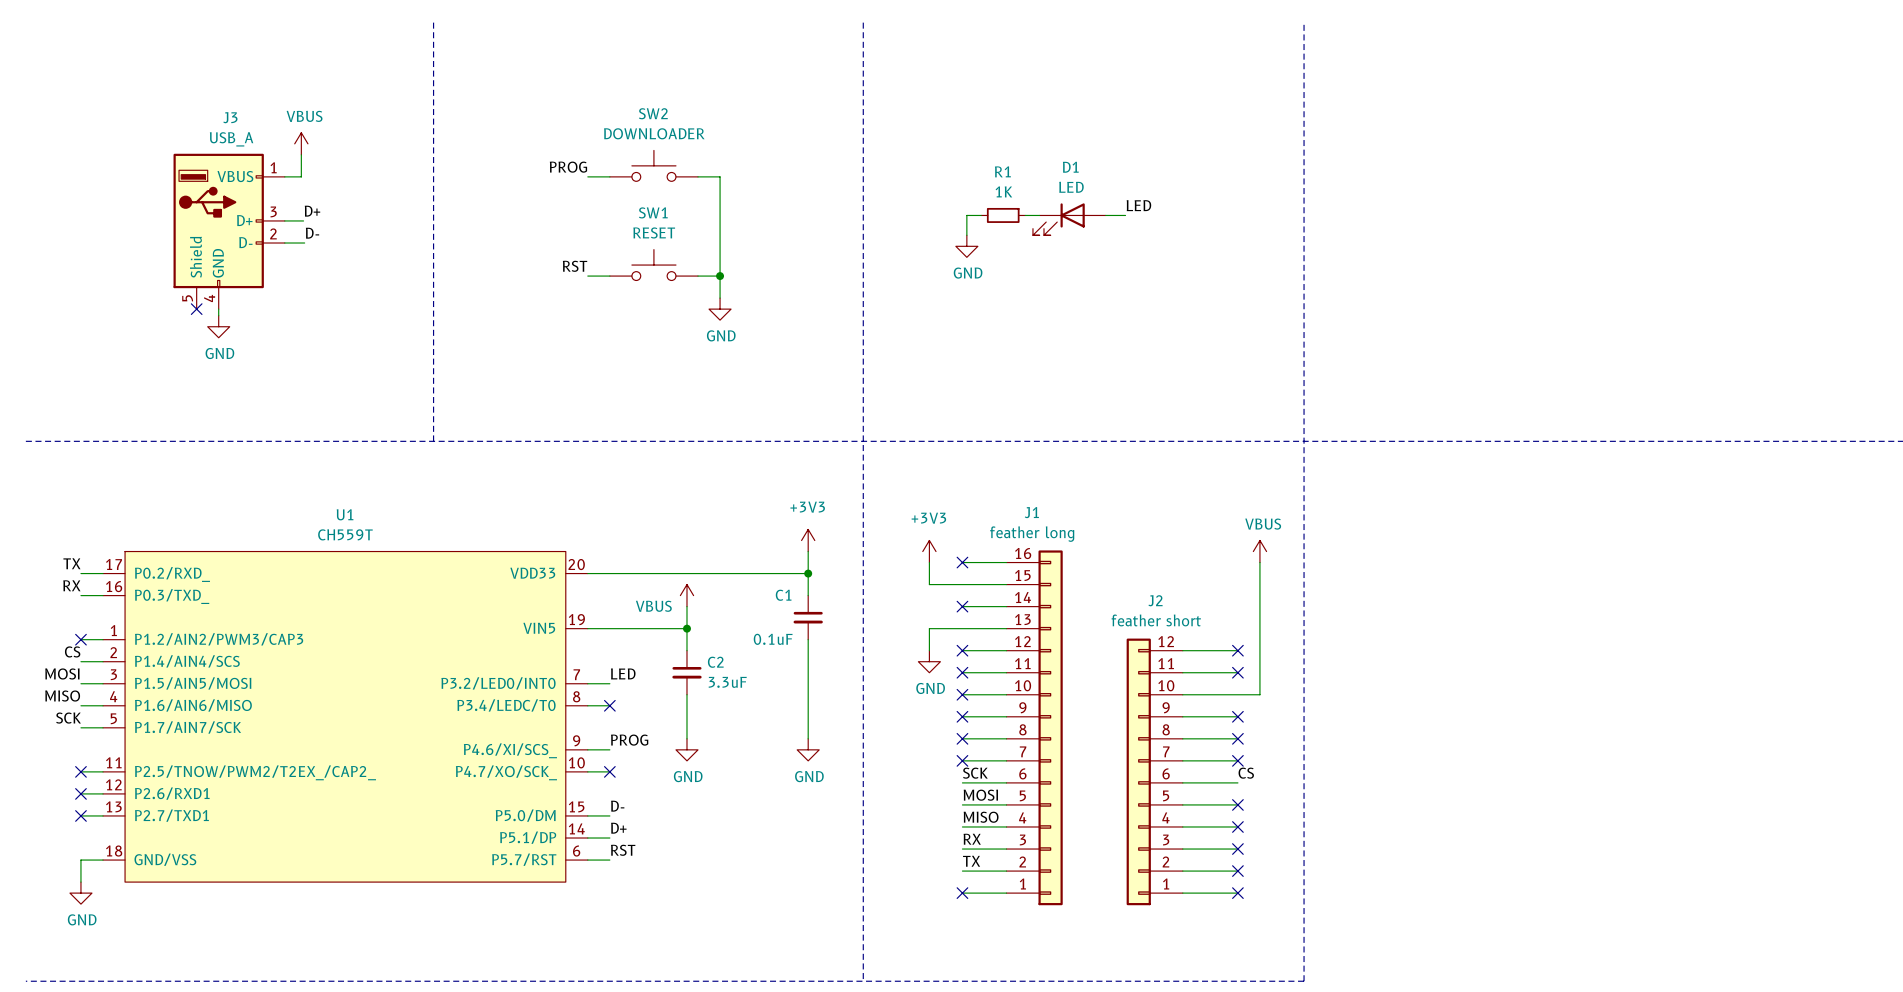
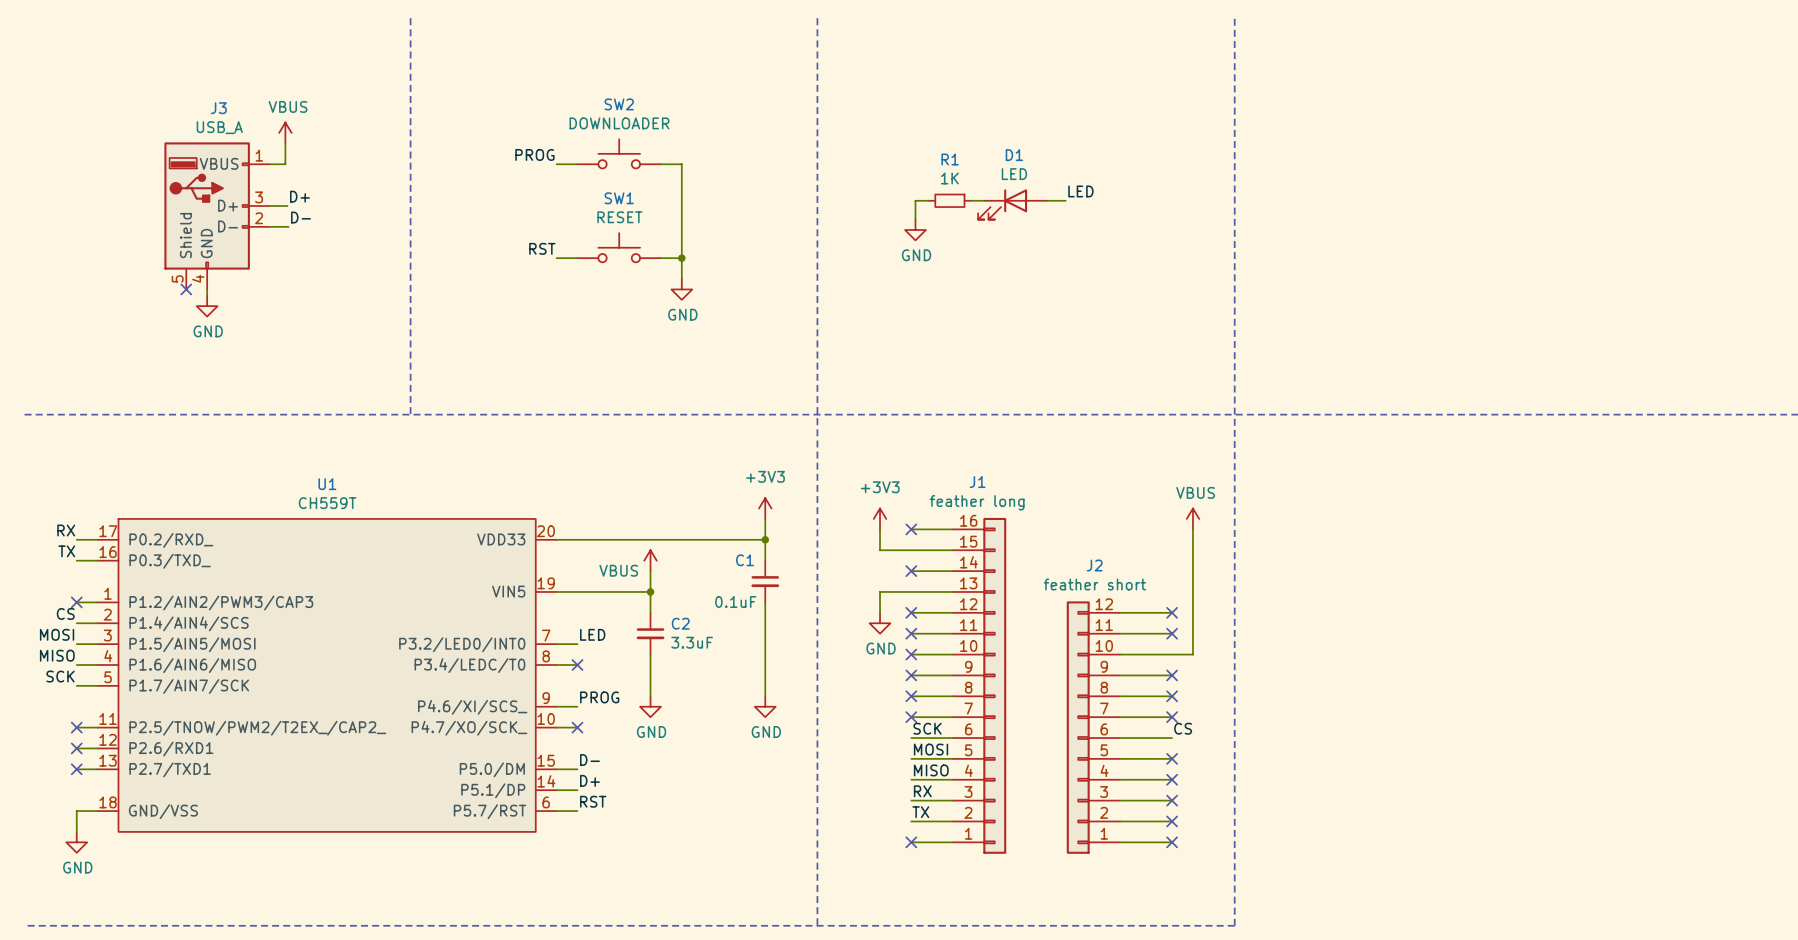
label: TX (71, 563) -> RX (66, 530)
label: RX (71, 585) -> TX (66, 551)

